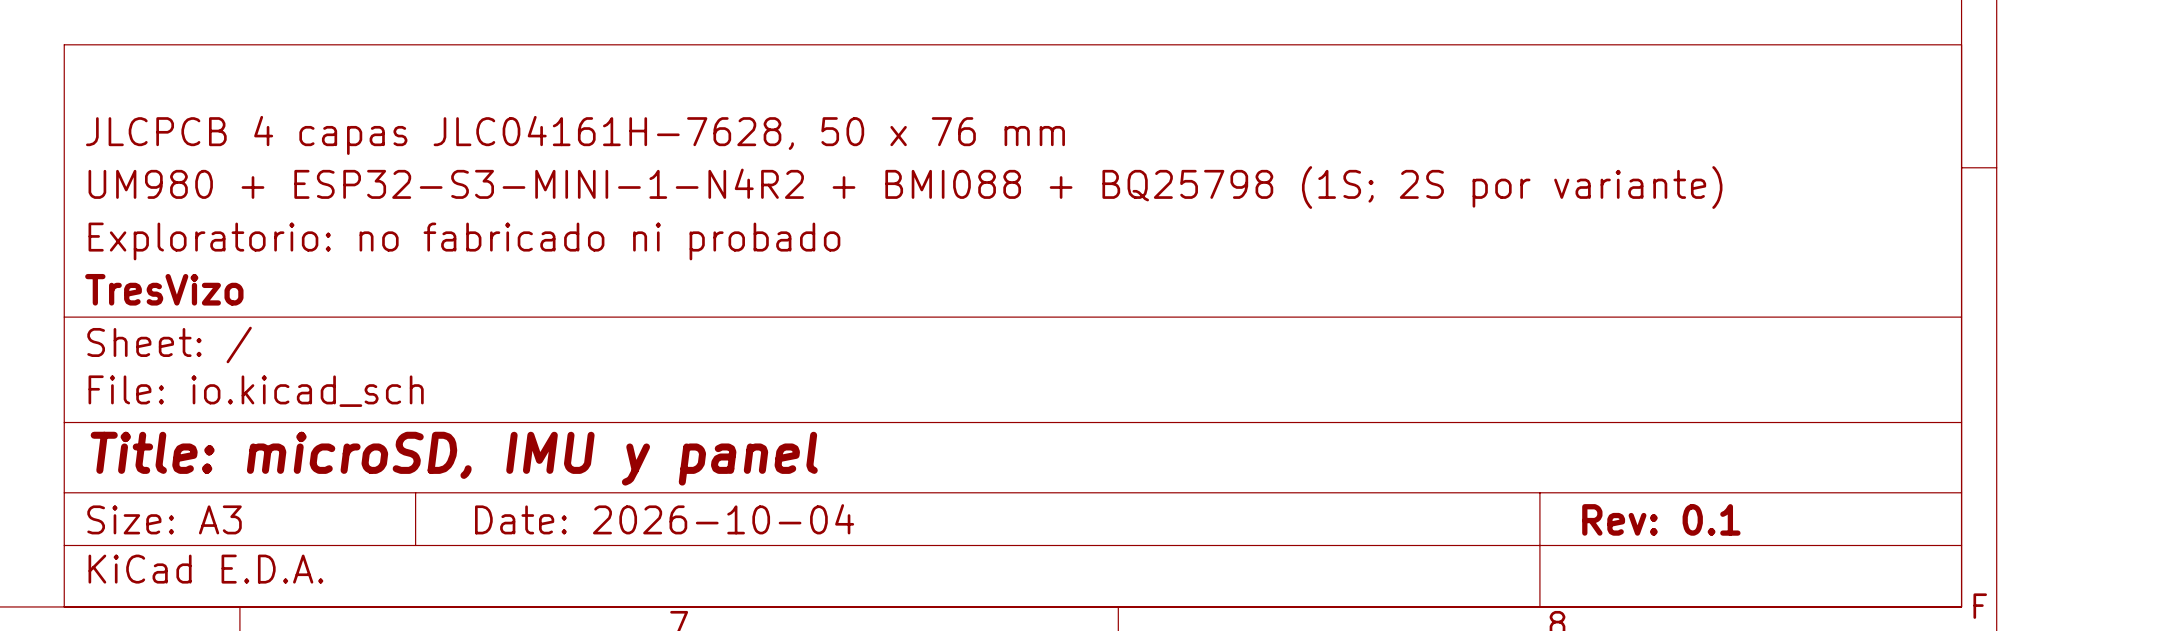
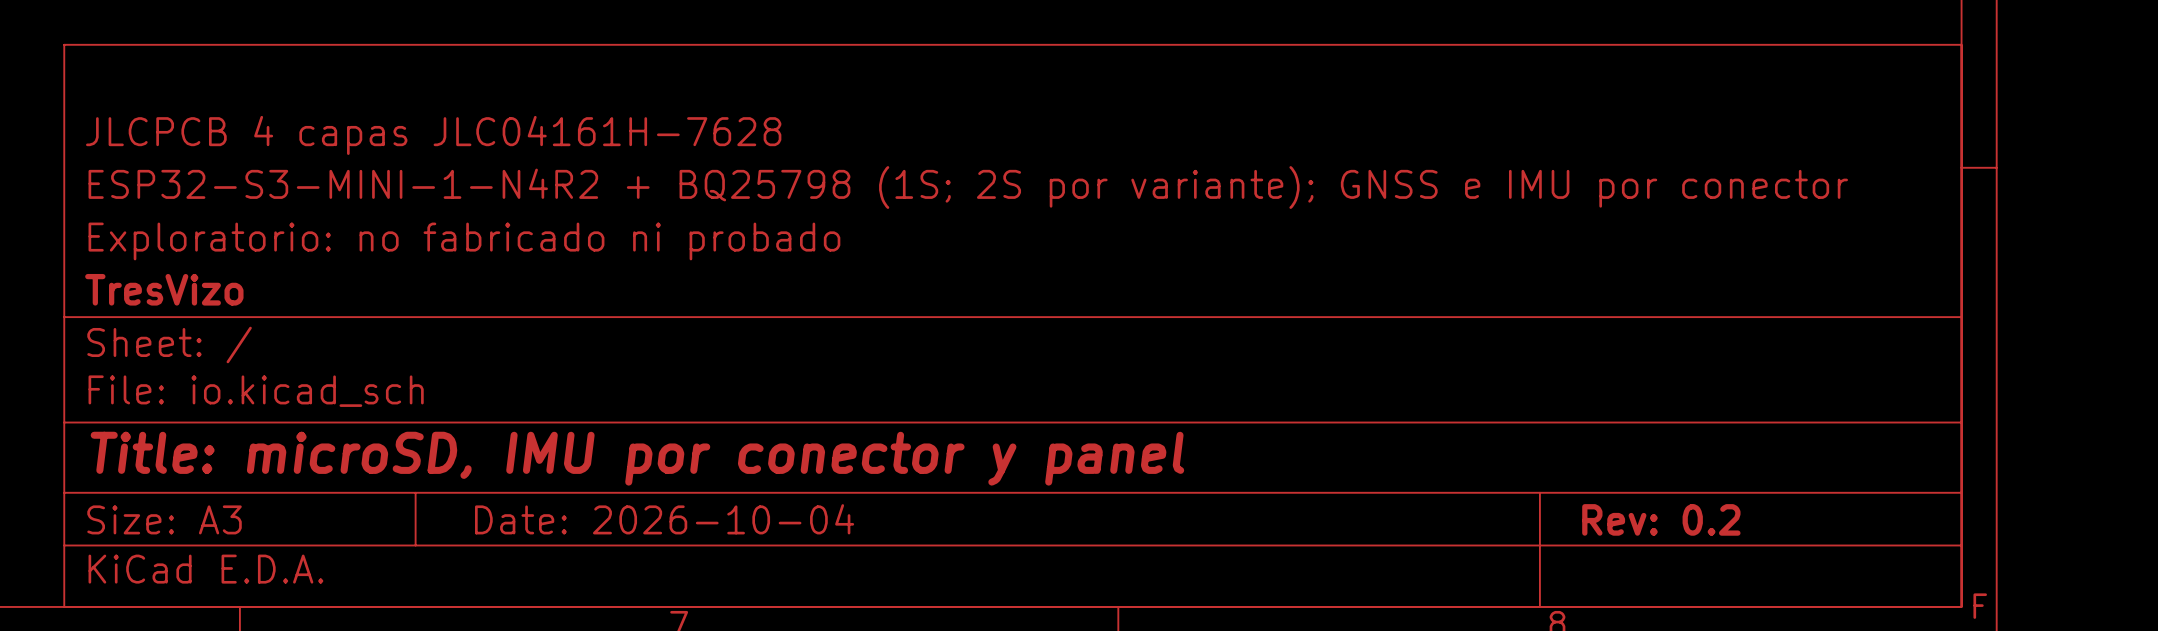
title block: JLCPCB 4 capas JLC04161H-7628, 50 x 76 mm (575, 135) -> JLCPCB 4 capas JLC04161H-7628 (433, 135)
title block: UM980 + ESP32-S3-MINI-1-N4R2 + BMI088 + BQ25798 (1S; 2S por variante) (905, 187) -> ESP32-S3-MINI-1-N4R2 + BQ25798 (1S; 2S por variante); GNSS e IMU por conector (968, 187)
title block: Title: microSD, IMU y panel (454, 458) -> Title: microSD, IMU por conector y panel (637, 458)
title block: Rev: 0.1 (1661, 519) -> Rev: 0.2 (1661, 519)

